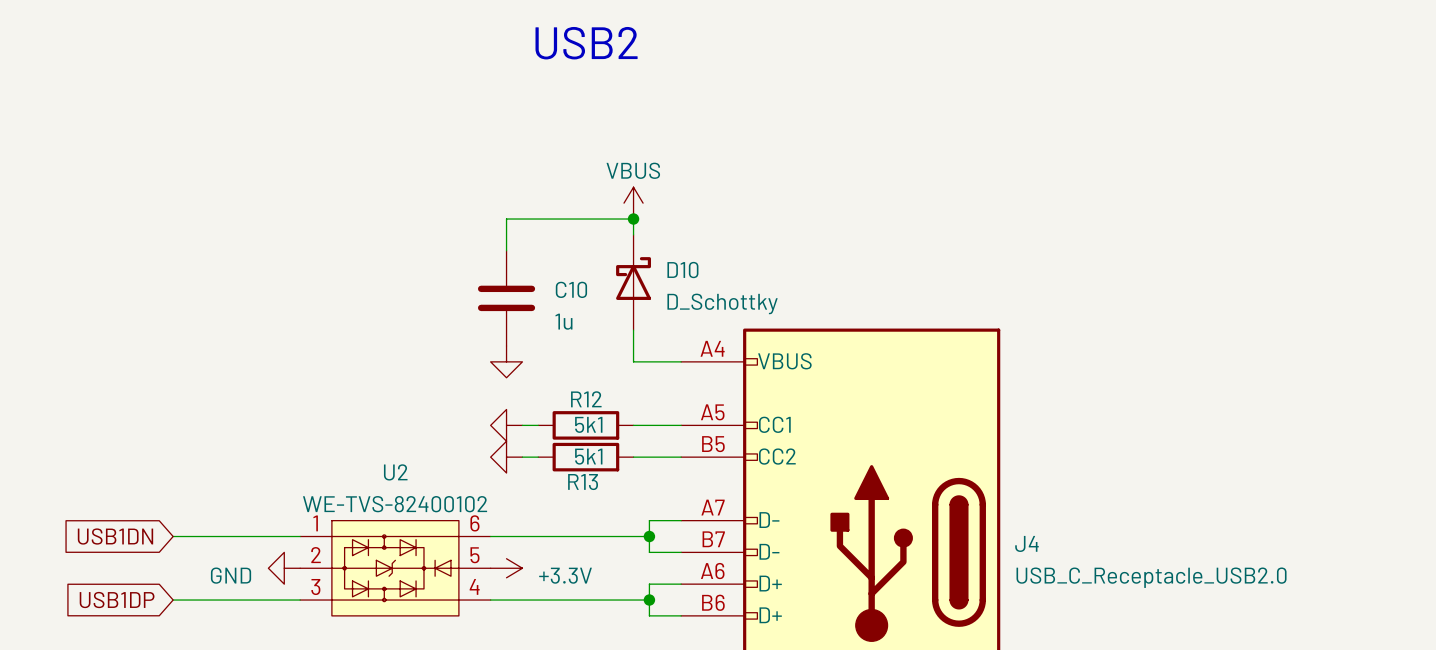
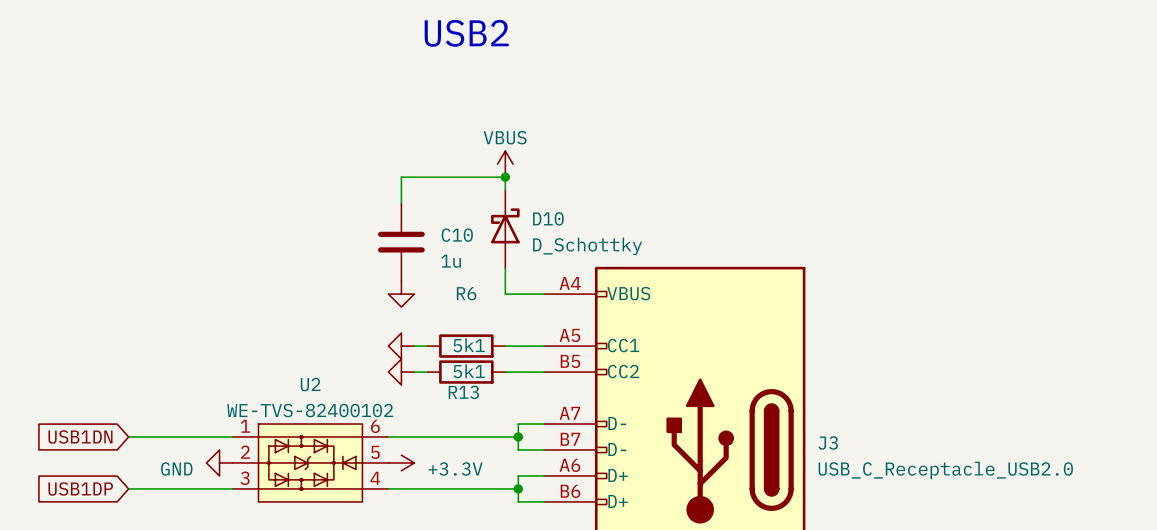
R12 name: R12 (586, 399) -> R6 (466, 293)
J4 name: J4 (1026, 543) -> J3 (828, 443)

